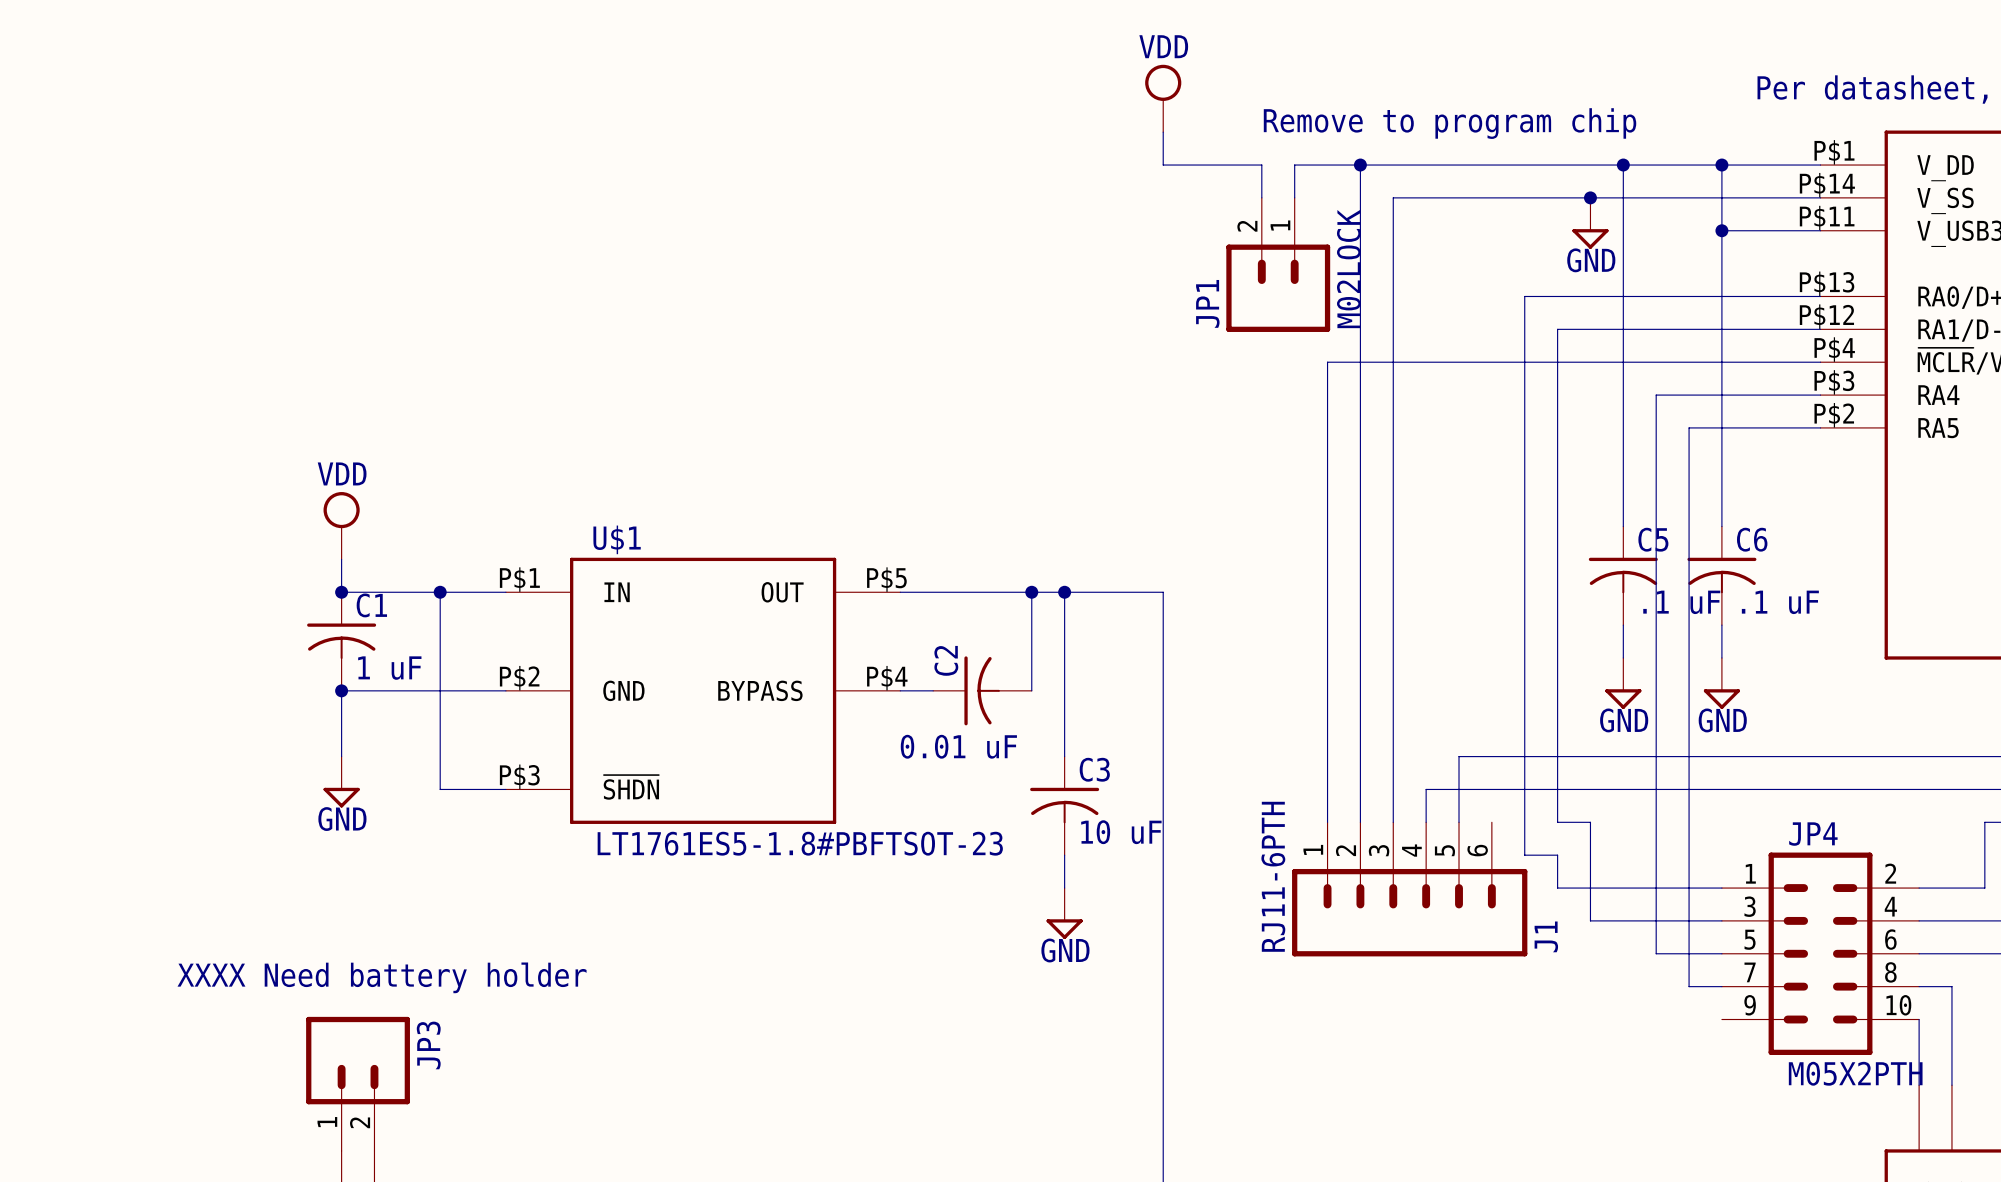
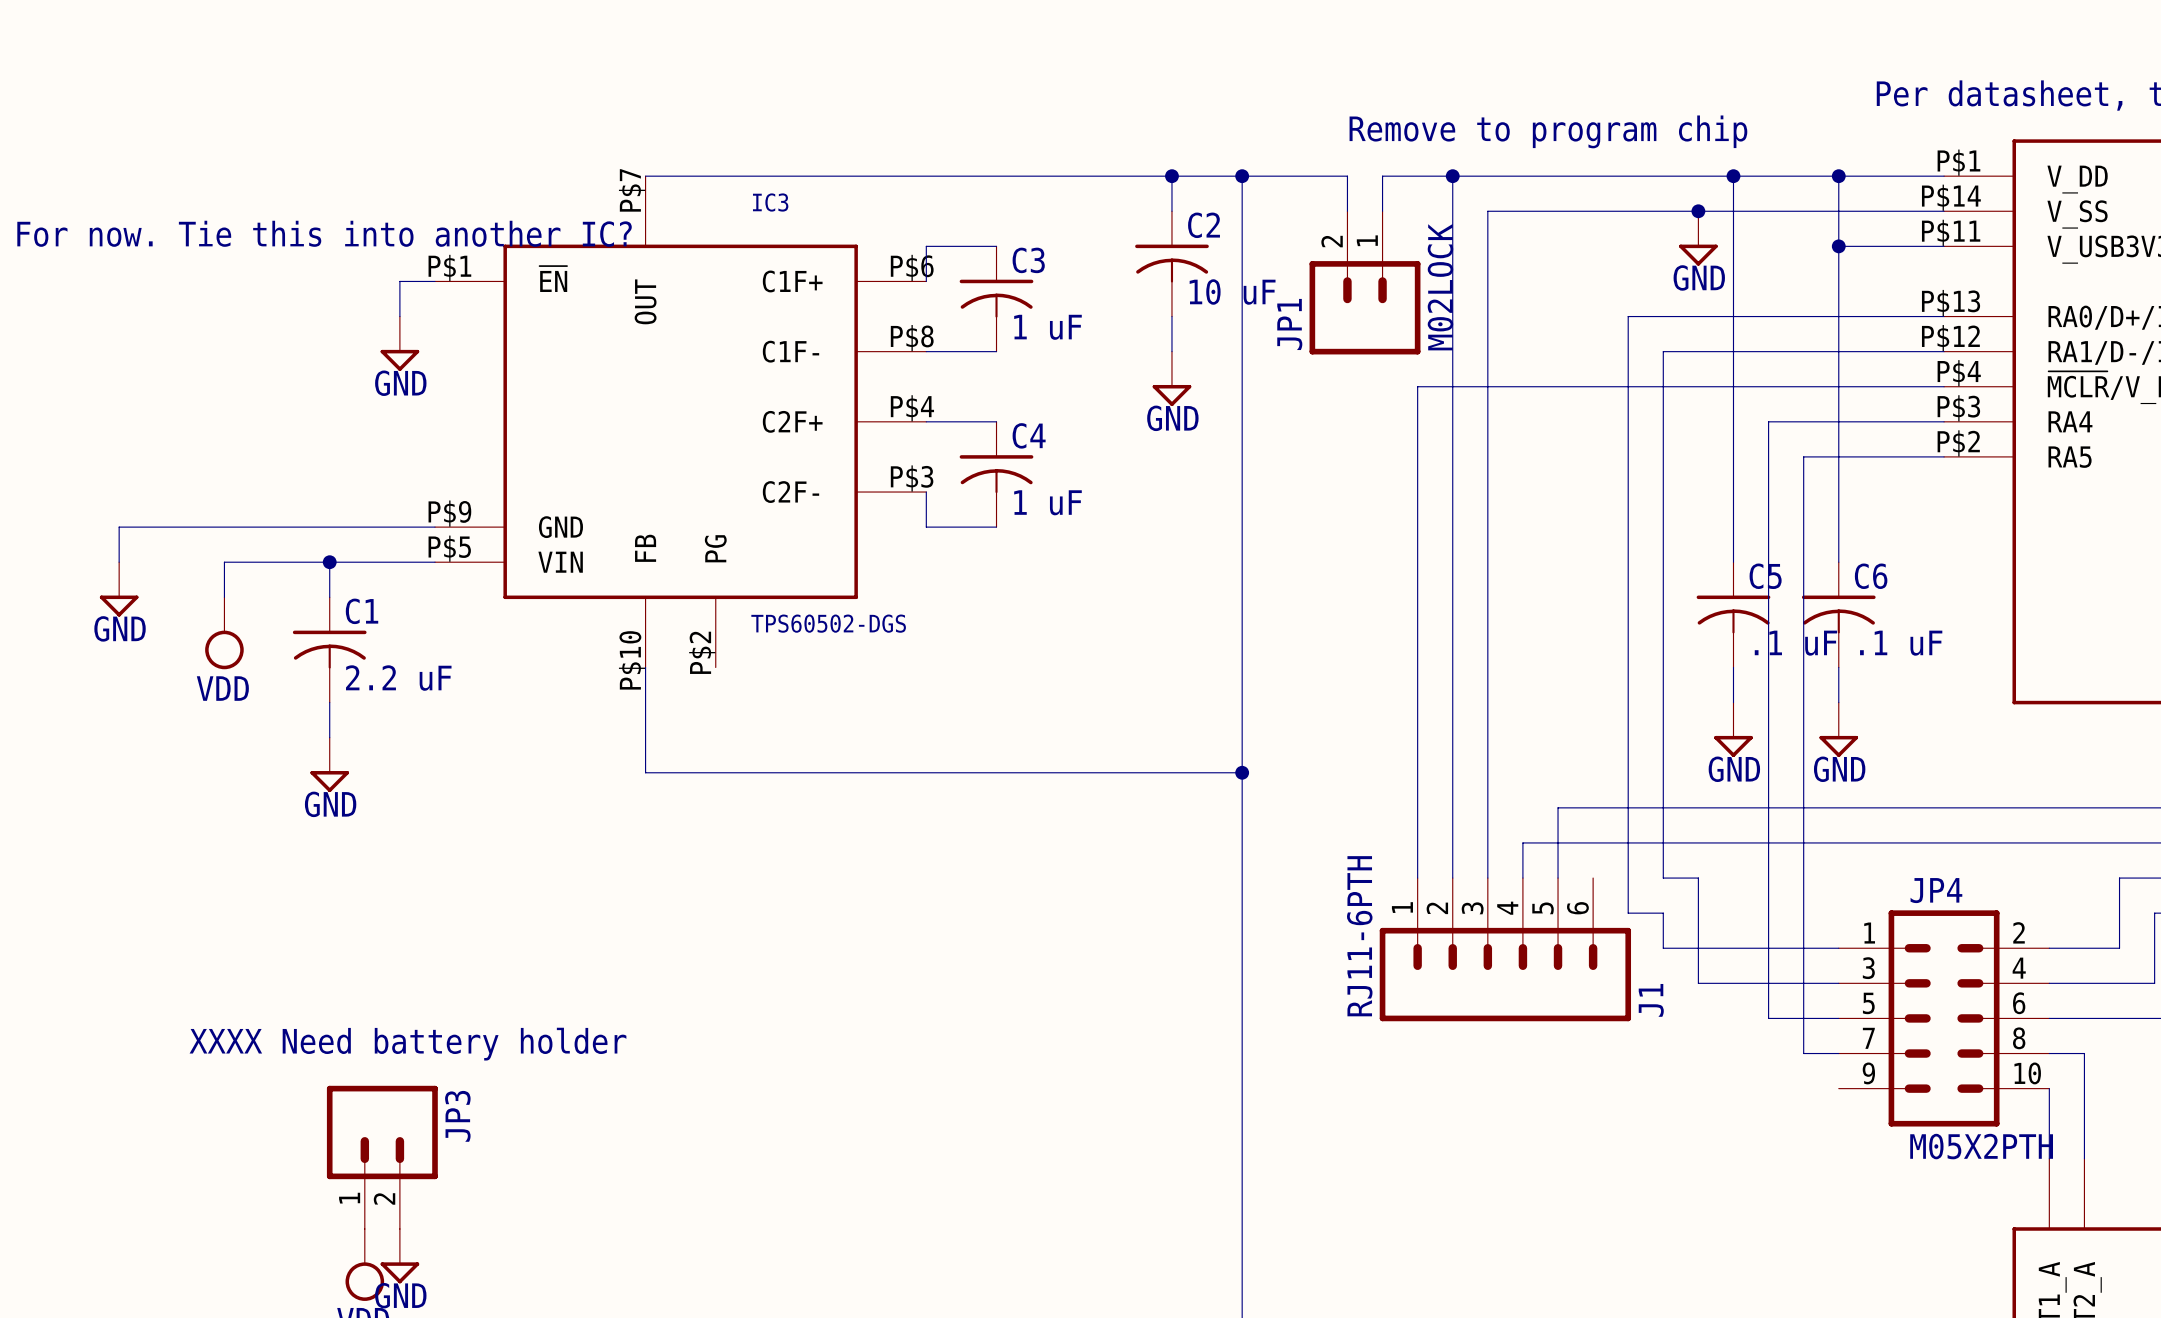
power symbol: VDD (1163, 98) -> none
wire: (1163, 132) (1163, 165) -> (1171, 176) (1171, 211)
junction: none -> (1171, 176)
junction: none -> (1242, 176)
text: none -> For now. Tie this into another IC? (324, 233)
wire: none -> (996, 246) (926, 246) (926, 281)
wire: none -> (435, 281) (399, 281) (399, 316)
wire: none -> (1171, 316) (1171, 351)
power symbol: none -> GND (399, 343)
wire: none -> (926, 351) (996, 351)
power symbol: none -> GND (1171, 378)
IC3: none -> TPS60502-DGS (680, 421)
wire: none -> (926, 421) (996, 421)
C4: none -> 1 uF (996, 474)
wire: none -> (926, 492) (926, 527) (996, 527)
wire: none -> (435, 527) (119, 527) (119, 562)
power symbol rotation: 0° (341, 510) -> 180° (224, 649)
power symbol position: VDD (341, 525) -> VDD (224, 633)
wire: none -> (329, 562) (329, 597)
junction: none -> (329, 562)
wire: none -> (435, 562) (224, 562) (224, 597)
power symbol: none -> GND (119, 589)
wire: (341, 559) (341, 592) (505, 592) -> none
junction: (341, 592) -> none
wire: (440, 592) (440, 789) (505, 789) -> none
junction: (440, 592) -> none
wire: (900, 592) (1163, 592) -> (645, 176) (1242, 176) (1242, 632)
wire: (1031, 592) (1031, 690) -> none
junction: (1031, 592) -> none
wire: (1064, 592) (1064, 756) -> none
junction: (1064, 592) -> none
wire: none -> (645, 667) (645, 772) (1242, 772)
C1 position: (341, 641) -> (329, 649)
wire: none -> (329, 702) (329, 737)
C1 value: 1 uF (389, 668) -> 2.2 uF (398, 678)
junction: (341, 690) -> none
wire: (505, 690) (341, 690) (341, 756) -> none
U$1: LT1761ES5-1.8#PBFTSOT-23 (703, 690) -> none
wire: (900, 690) (933, 690) -> none
C2 rotation: 0° (982, 690) -> 90° clockwise (1171, 263)
C2 position: (982, 690) -> (1171, 263)
junction: none -> (1242, 772)
C2 value: 0.01 uF (958, 746) -> 10 uF (1232, 292)
power symbol position: GND (341, 782) -> GND (329, 764)
C3 position: (1064, 805) -> (996, 299)
C3 value: 10 uF (1121, 832) -> 1 uF (1047, 327)
wire: (1064, 855) (1064, 888) -> none
power symbol: GND (1064, 913) -> none

